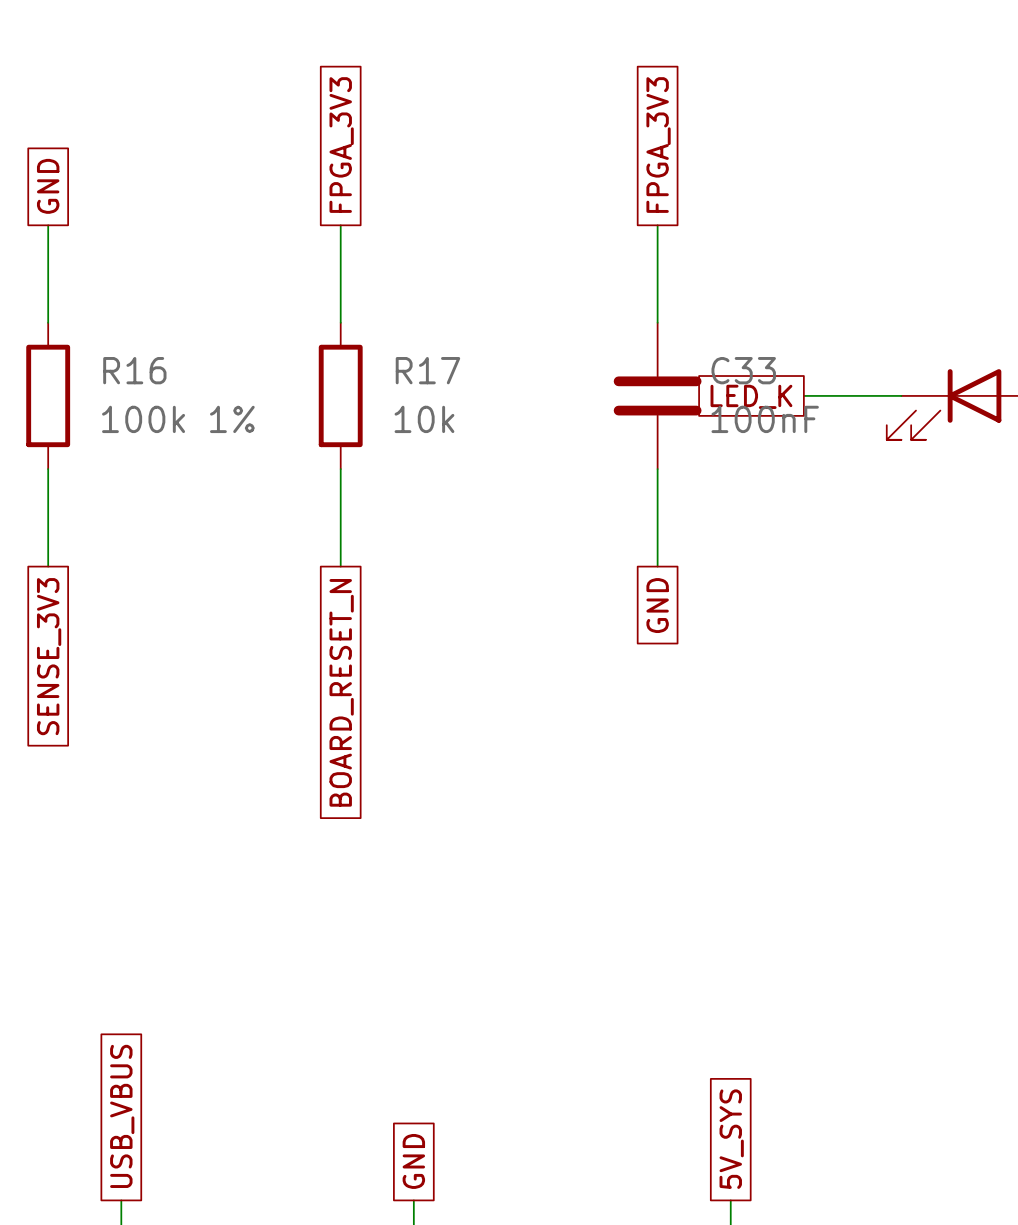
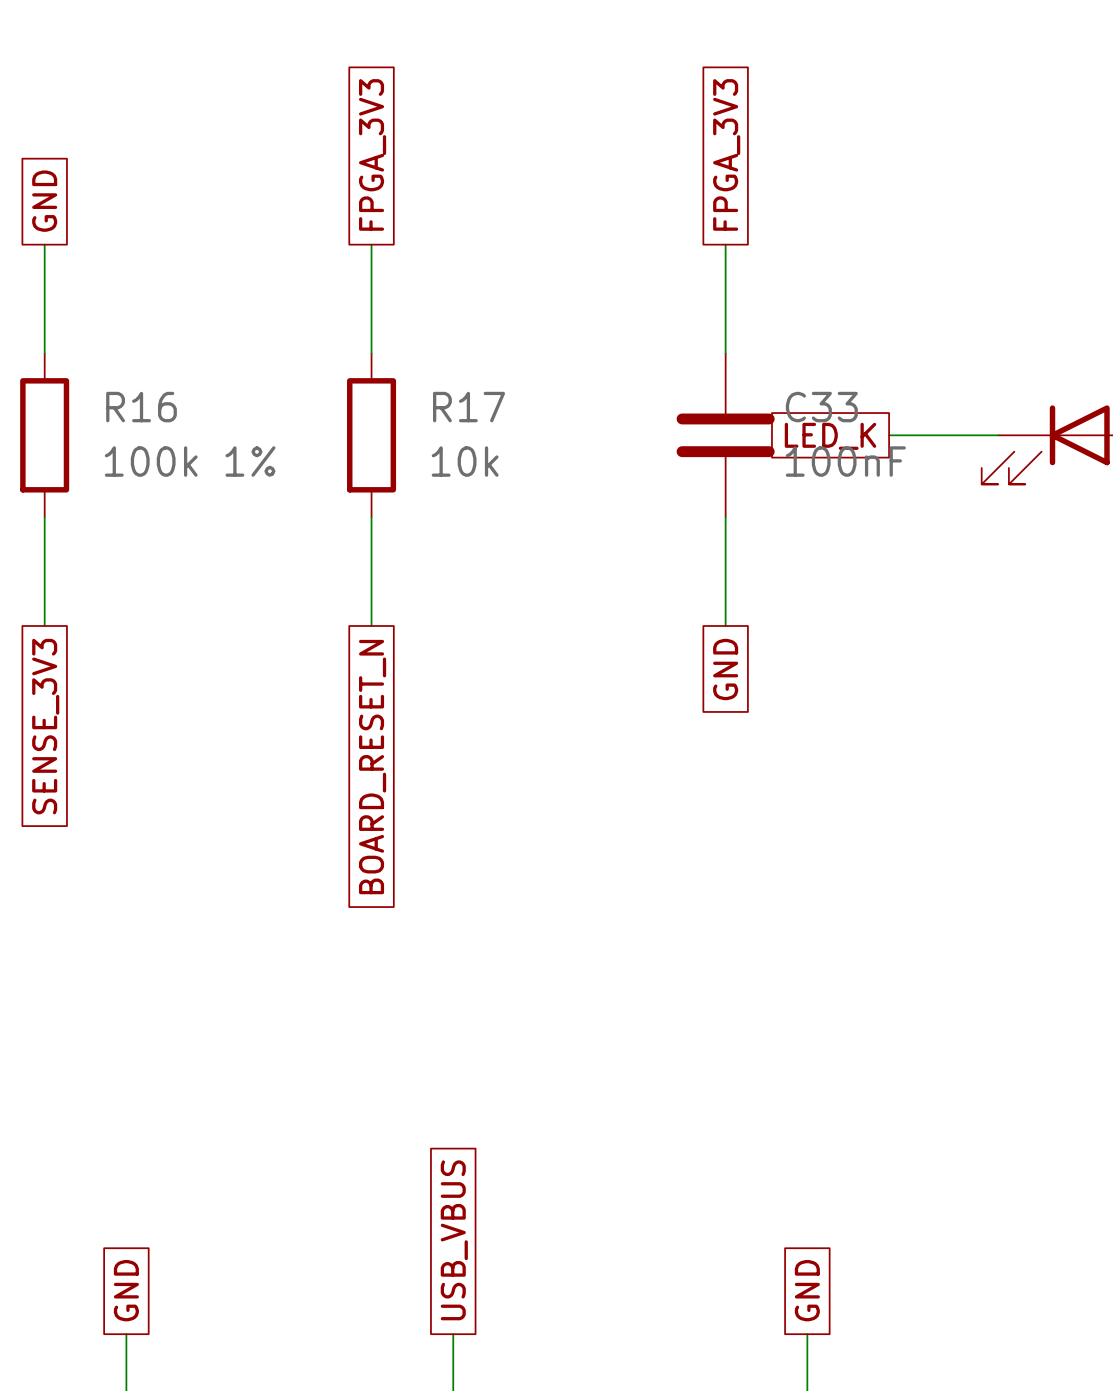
global label: USB_VBUS (122, 1116) -> GND (126, 1290)
global label: 5V_SYS (731, 1139) -> GND (807, 1290)
global label: GND (413, 1161) -> USB_VBUS (454, 1240)

